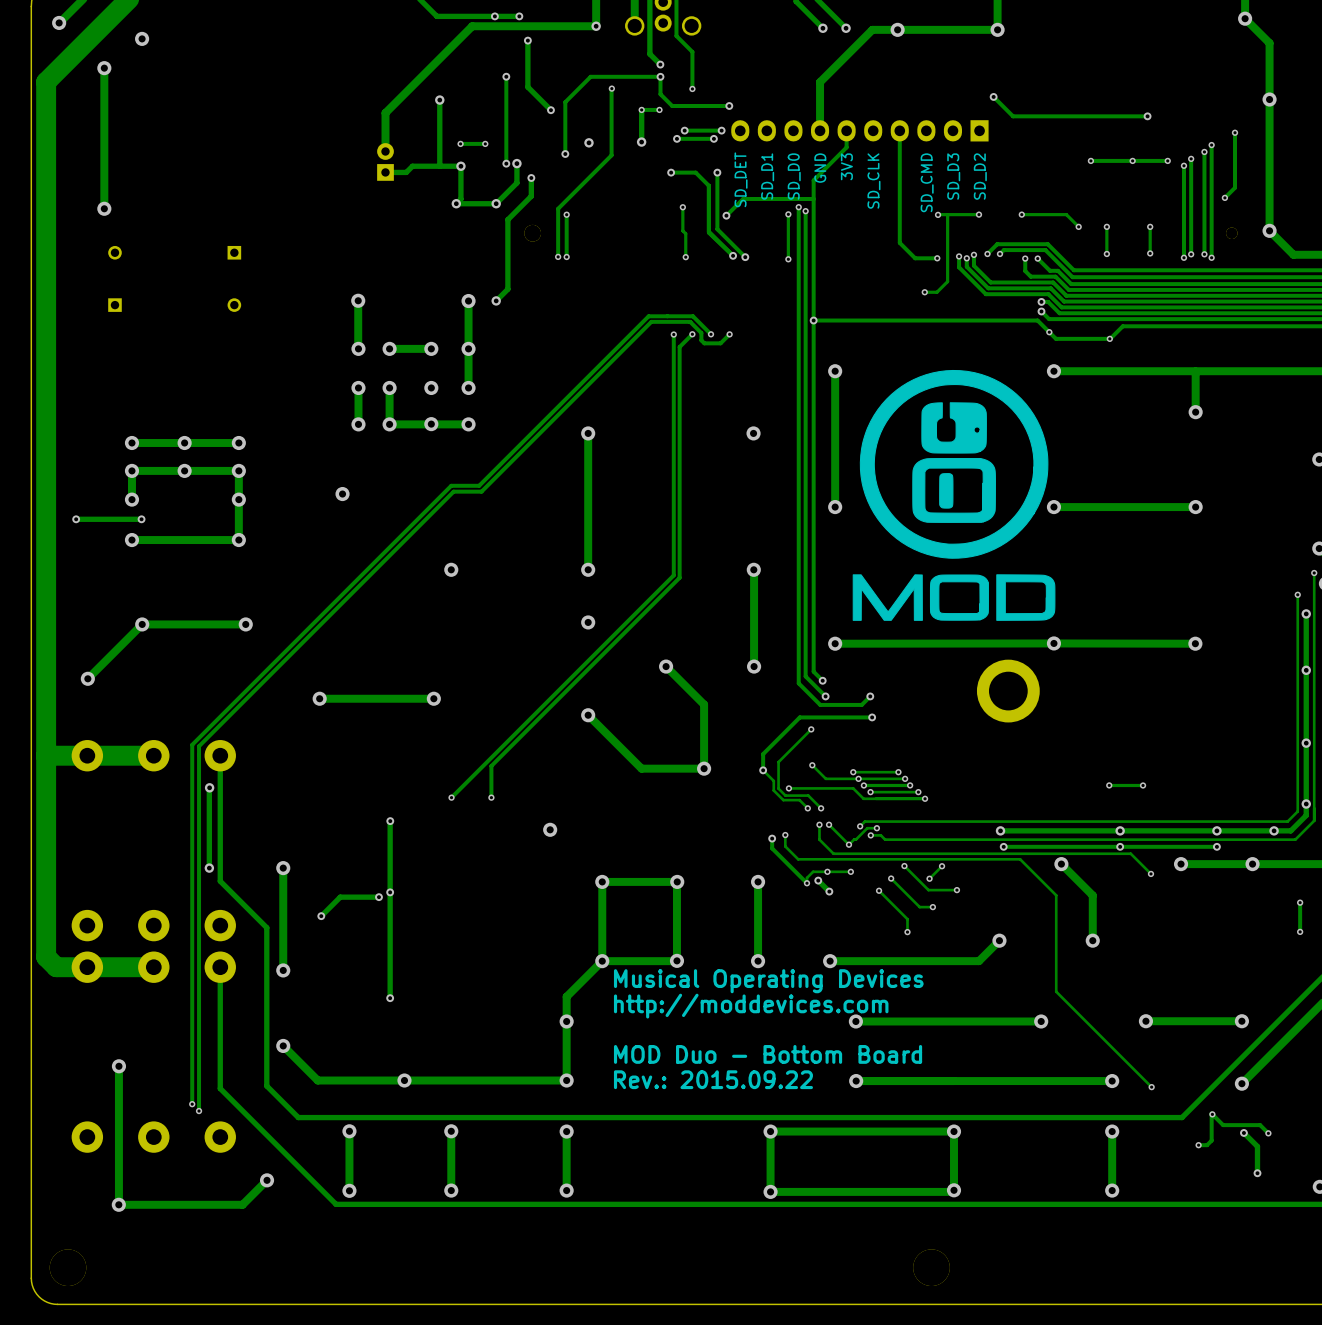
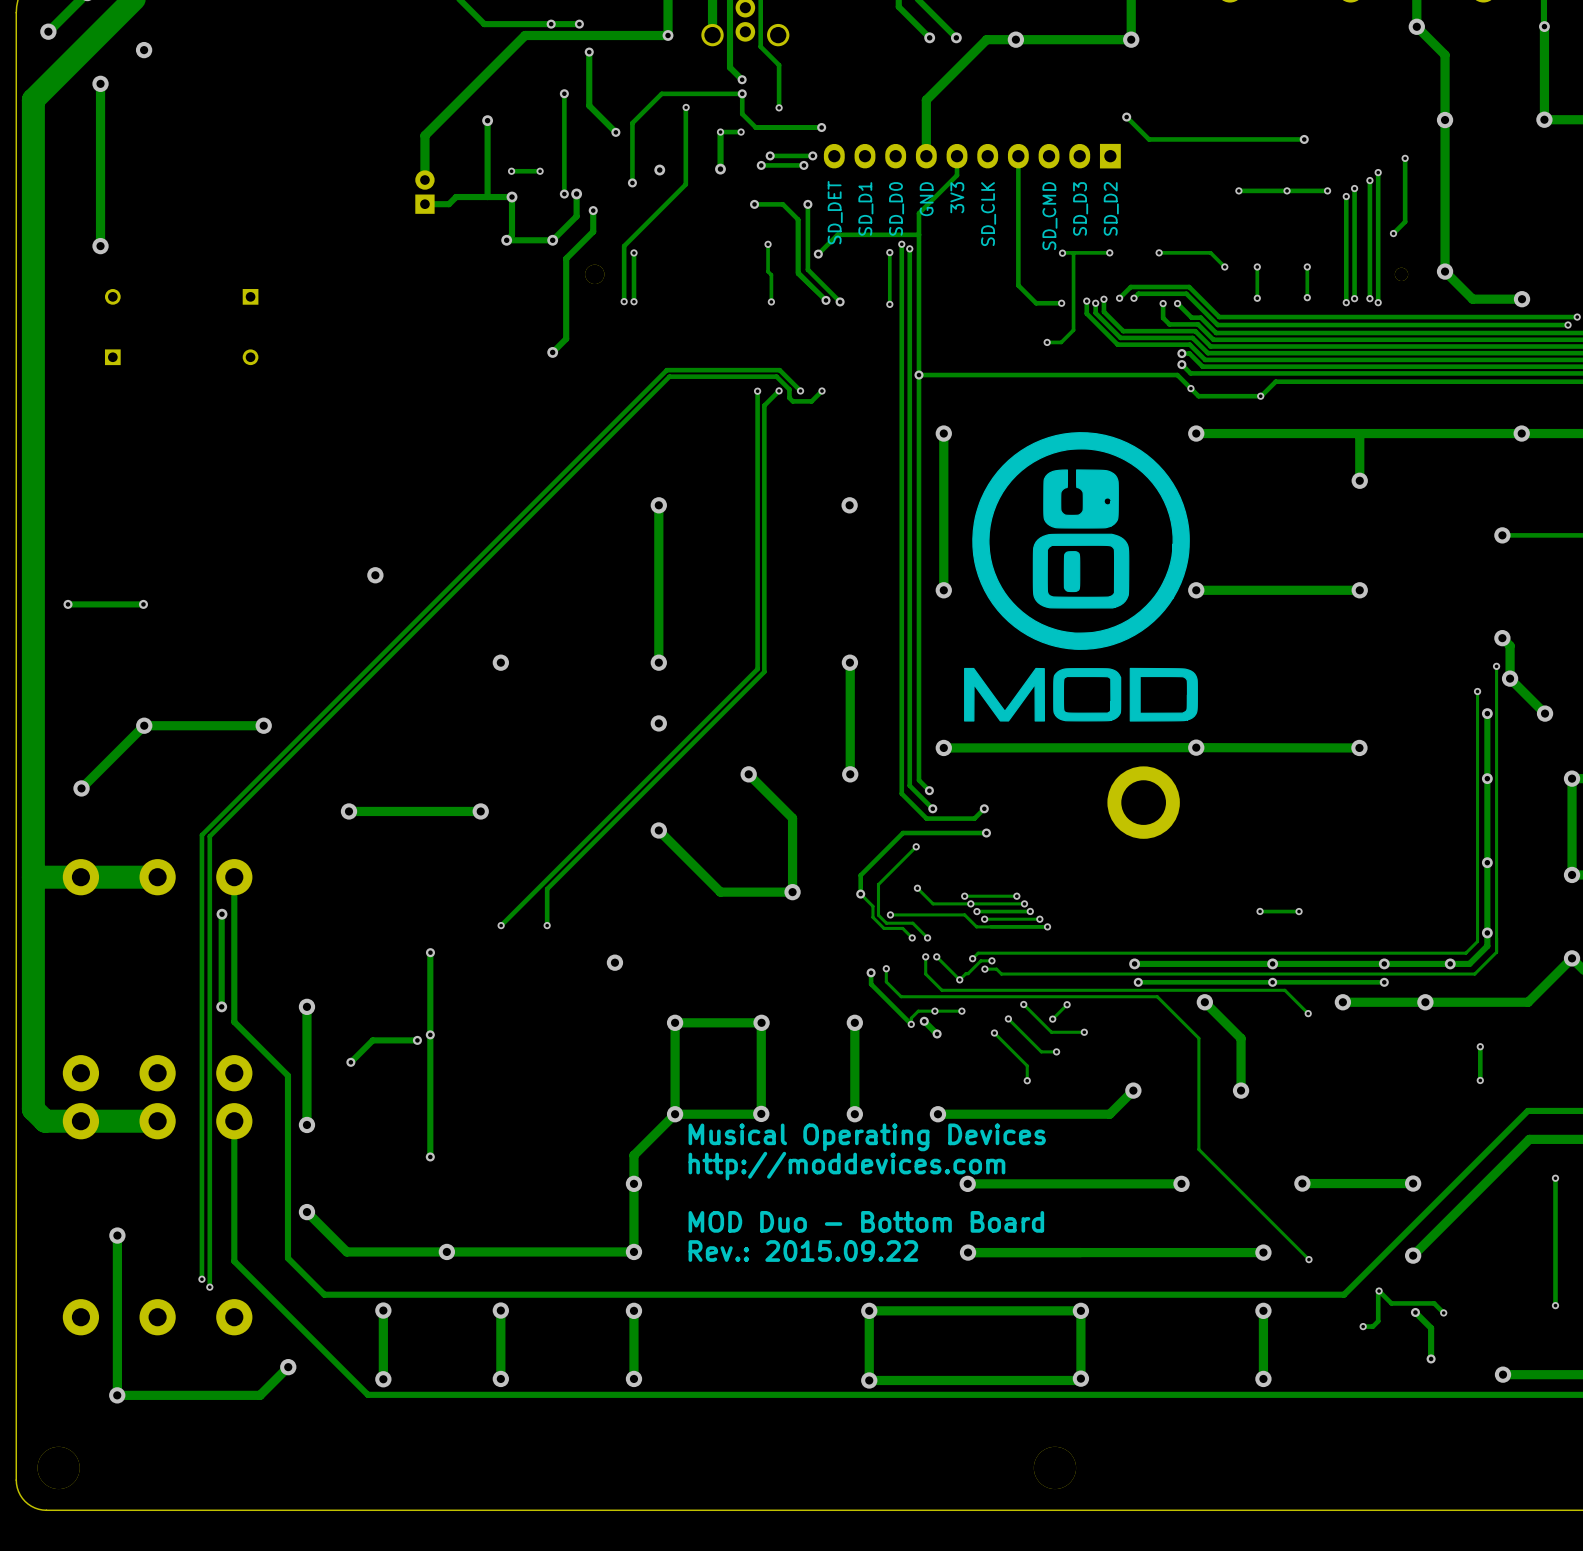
track: (358, 300) (358, 348) -> none
via: (358, 300) -> none
track: (468, 301) (468, 387) -> none
via: (468, 301) -> none
track: (648, 316) (479, 485) (451, 485) (192, 744) -> (728, 370) (666, 370) (201, 835) (201, 864)
track: (690, 321) (651, 321) (481, 491) (453, 491) (199, 746) -> (776, 376) (669, 376) (209, 836) (209, 866)
via: (358, 348) -> none
via: (389, 348) -> none
track: (431, 348) (389, 348) -> none
via: (431, 348) -> none
via: (468, 348) -> none
track: (358, 387) (358, 424) -> none
via: (358, 387) -> none
track: (389, 387) (389, 424) (468, 424) -> none
via: (389, 387) -> none
via: (431, 387) -> none
via: (468, 387) -> none
via: (358, 424) -> none
via: (389, 424) -> none
via: (431, 424) -> none
via: (468, 424) -> none
via: (131, 442) -> none
via: (184, 442) -> none
track: (238, 442) (131, 442) -> none
via: (238, 442) -> none
via: (131, 470) -> none
via: (184, 470) -> none
via: (238, 470) -> none
track: (131, 499) (131, 470) (238, 470) (238, 540) (131, 540) -> none
via: (131, 499) -> none
via: (238, 499) -> none
via: (131, 540) -> none
via: (238, 540) -> none

